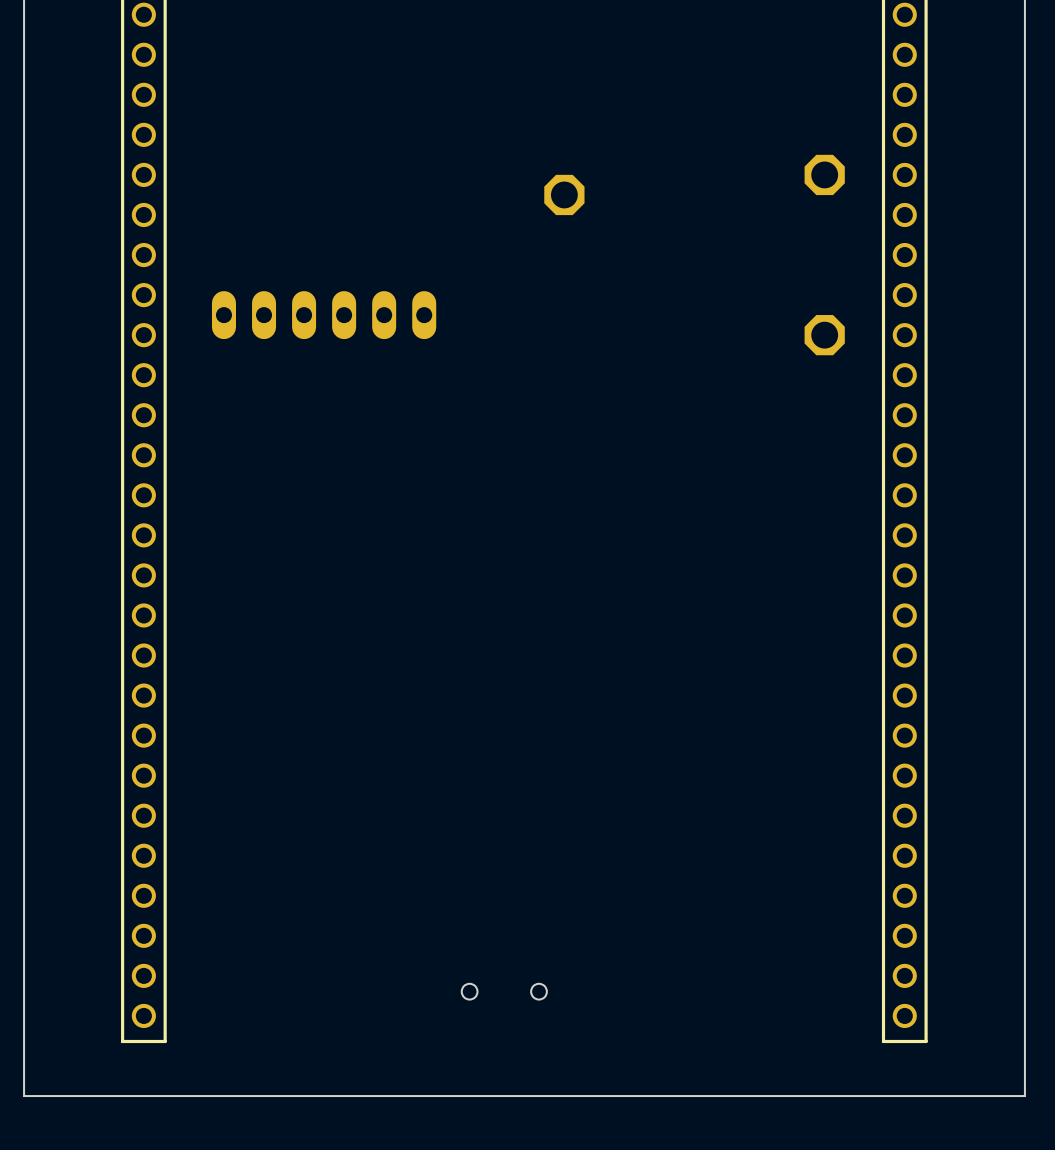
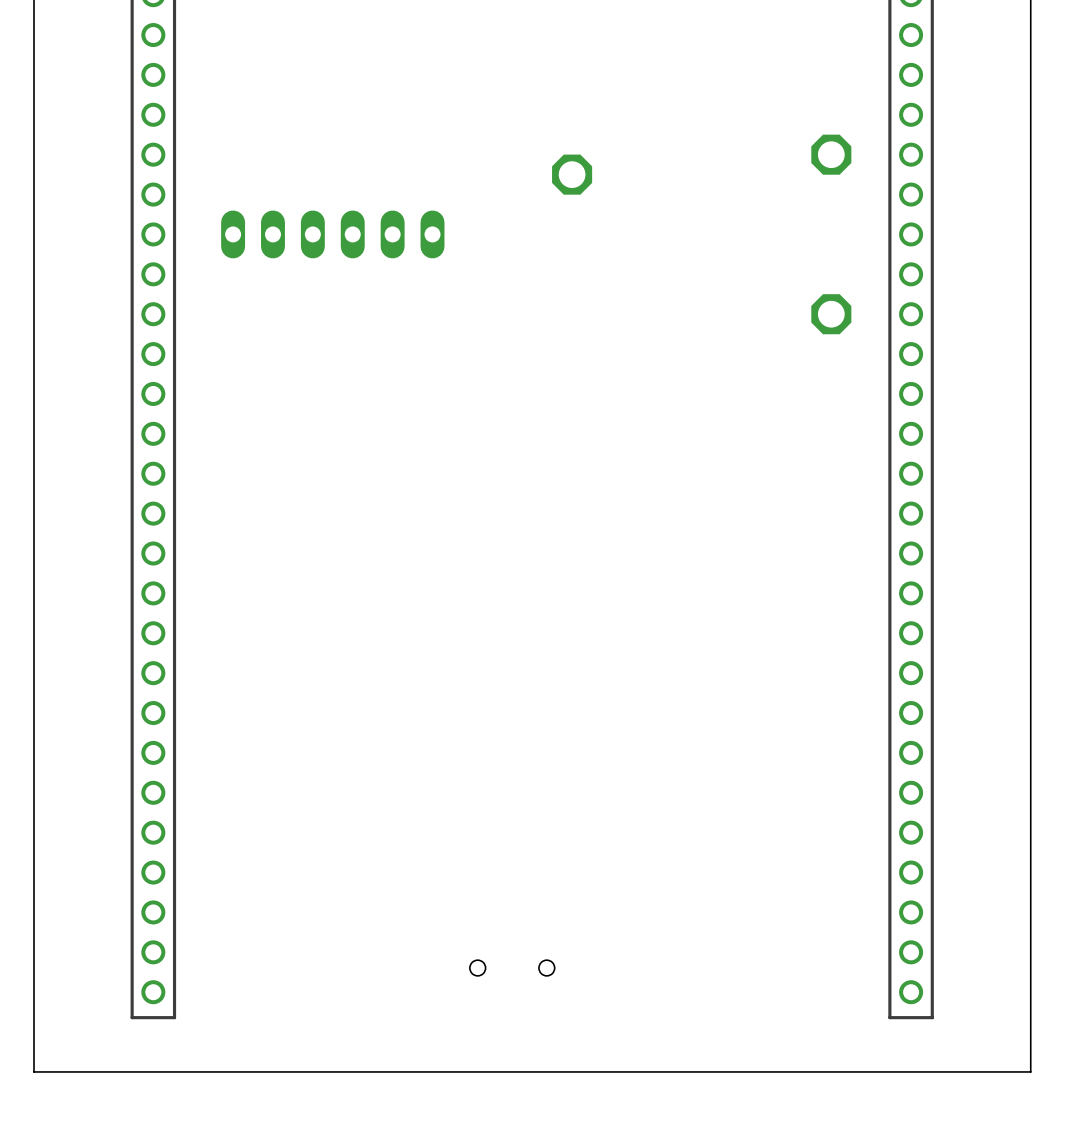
part position: (324, 315) -> (332, 234)

